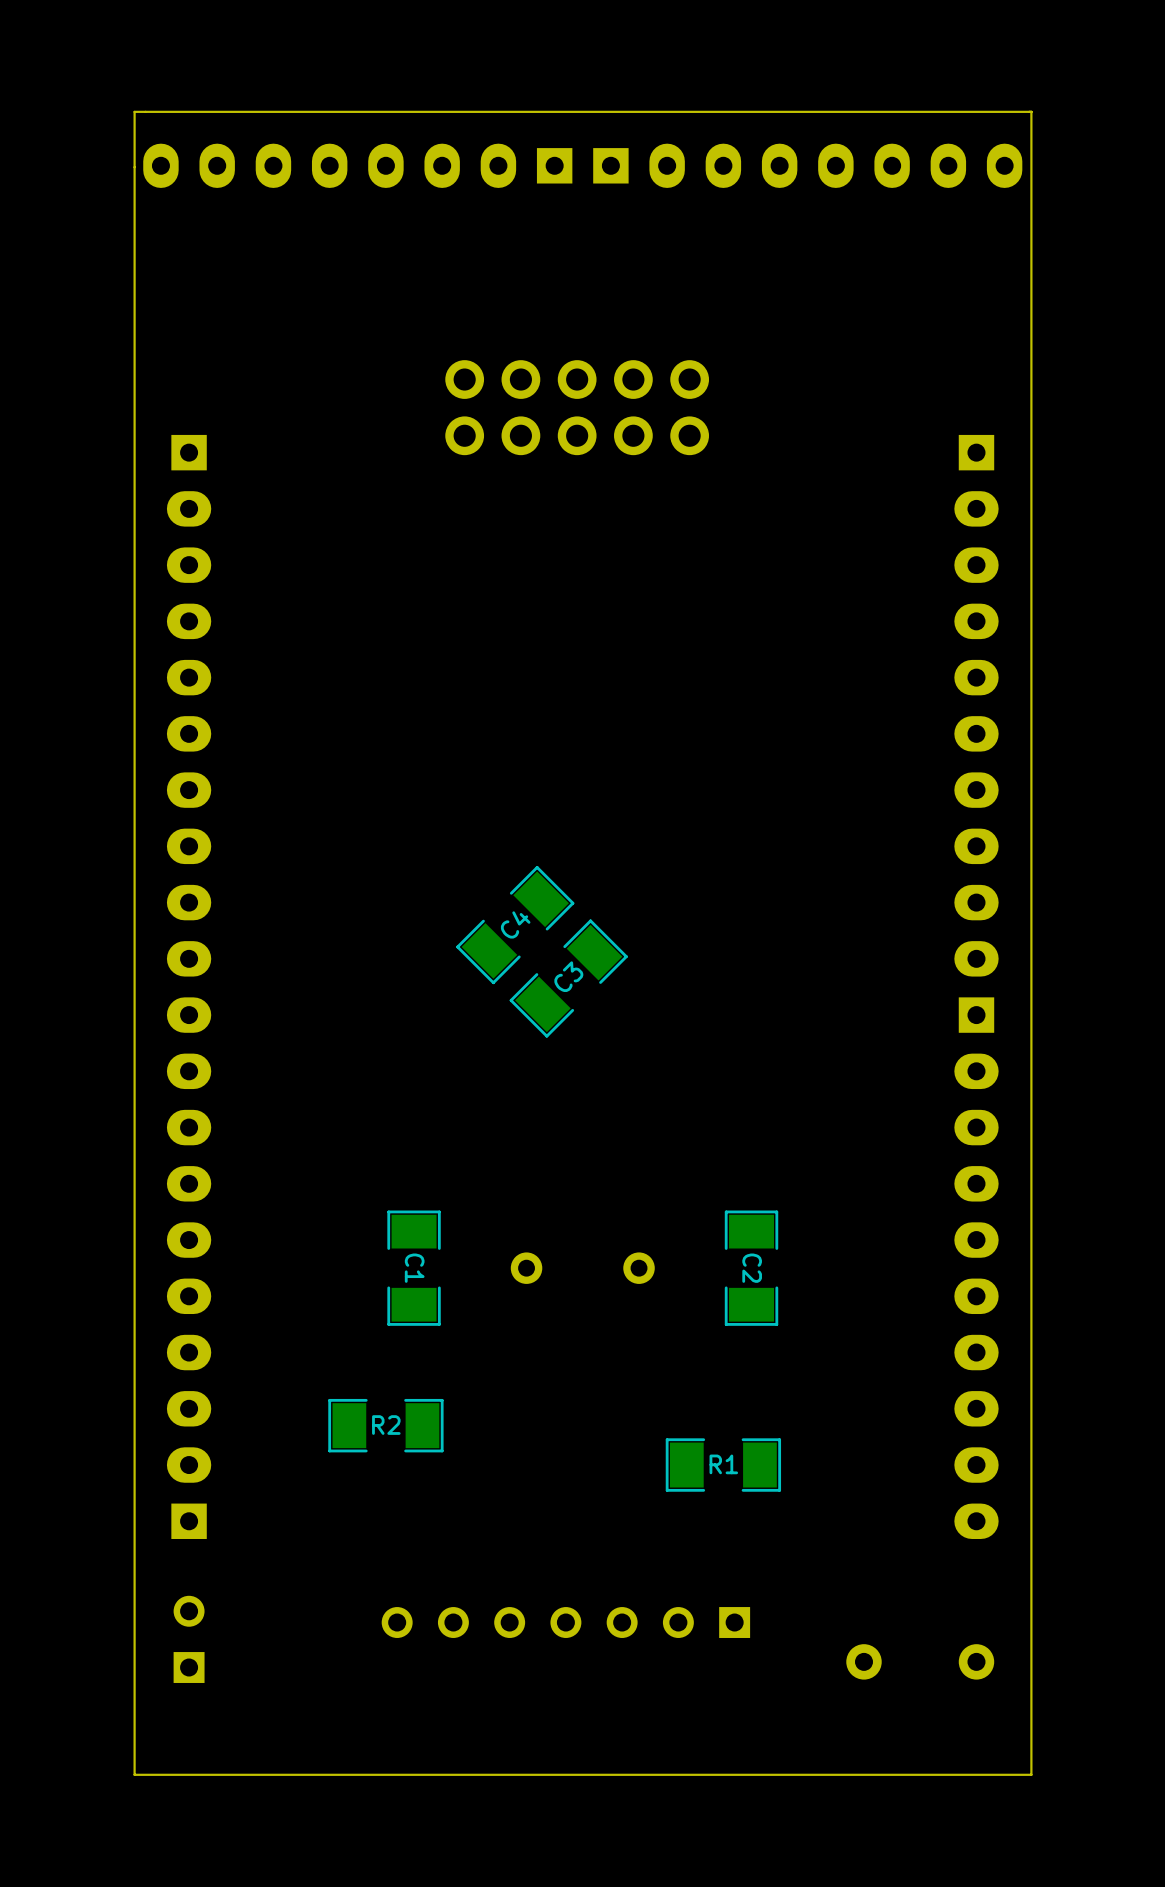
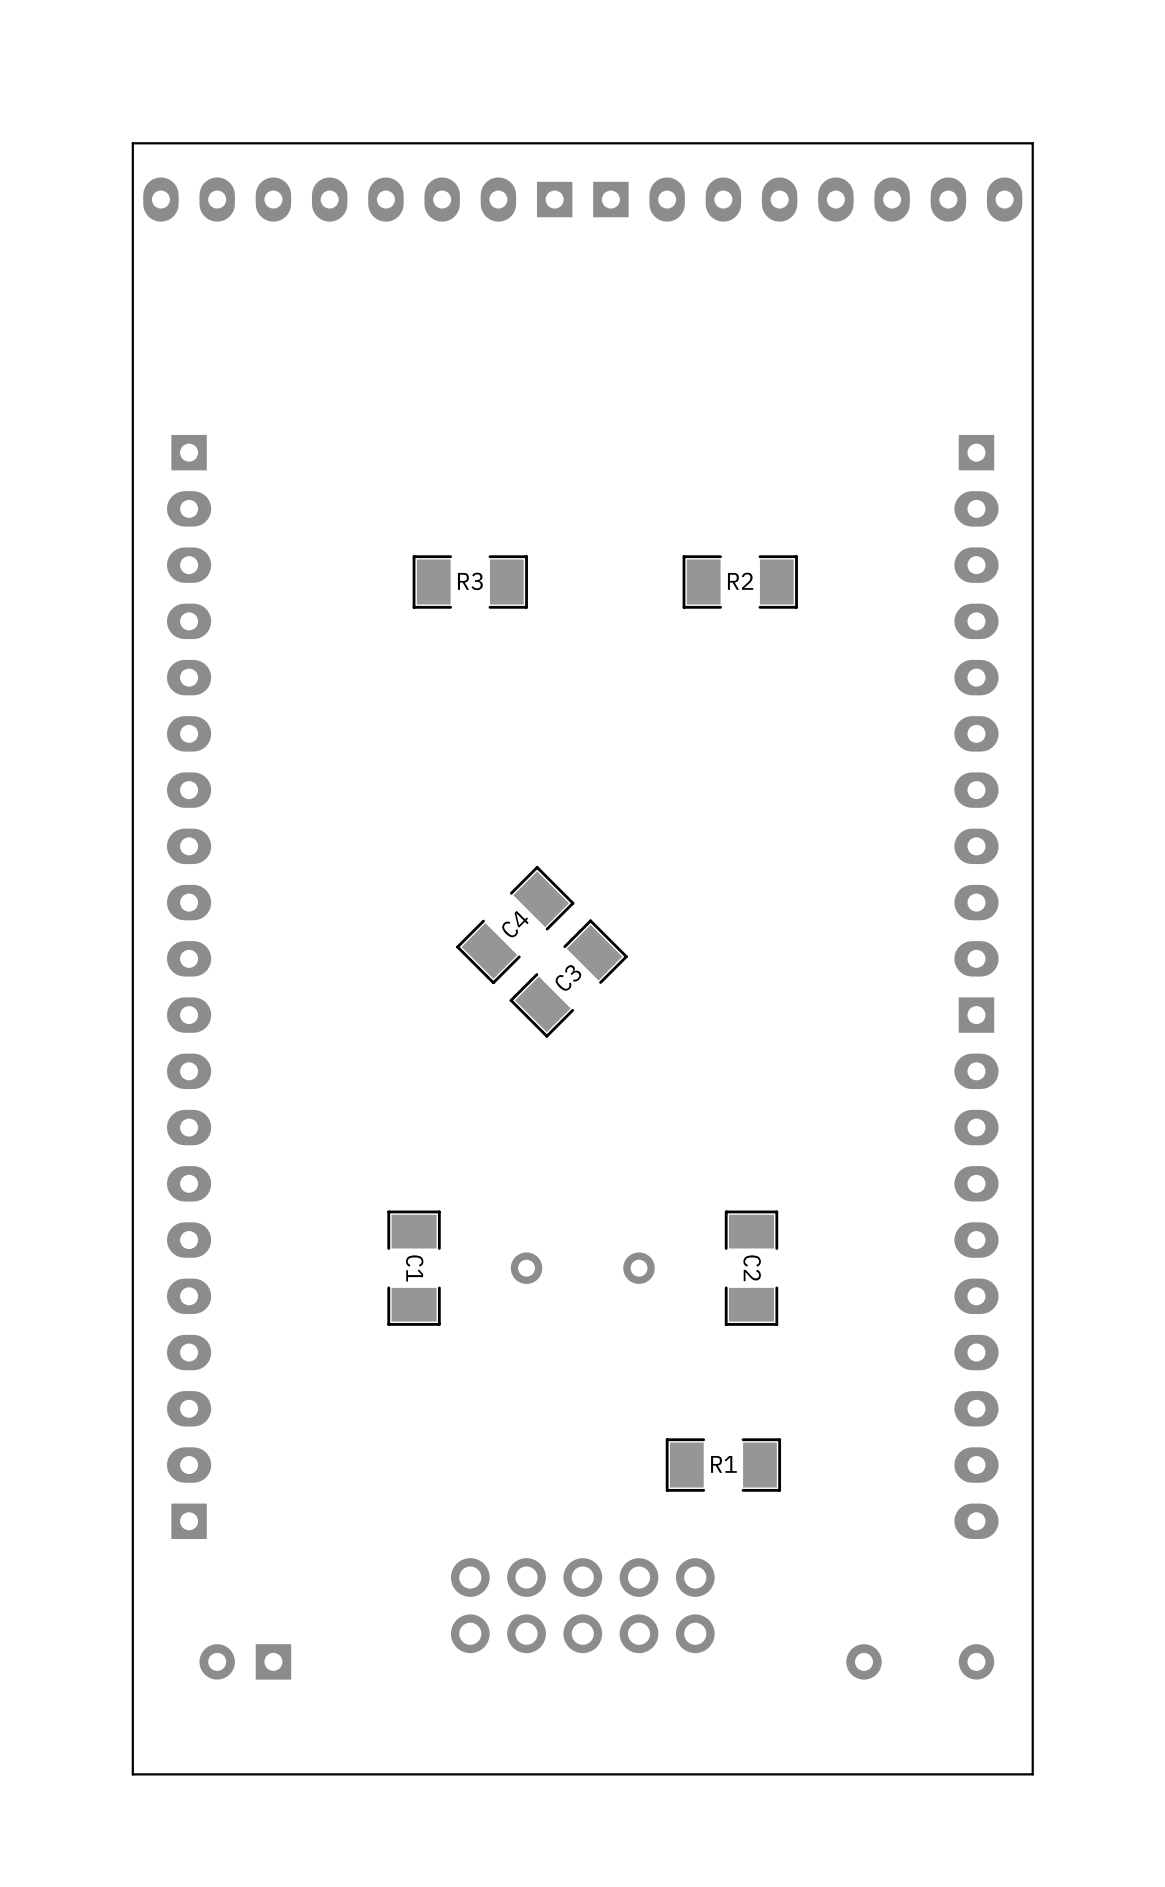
board edge: (1031, 111) (134, 111) (134, 1774) (1031, 1774) (1031, 111) -> (1032, 143) (1032, 1774) (132, 1774) (132, 143) (1032, 143)
part position: (357, 165) -> (357, 199)
part position: (807, 165) -> (807, 199)
part: (577, 407) -> none
R3: none -> (470, 582)
R2 position: (385, 1425) -> (740, 582)
part: none -> (582, 1605)
part: (565, 1622) -> none
part: (189, 1639) -> none
part: none -> (245, 1661)

